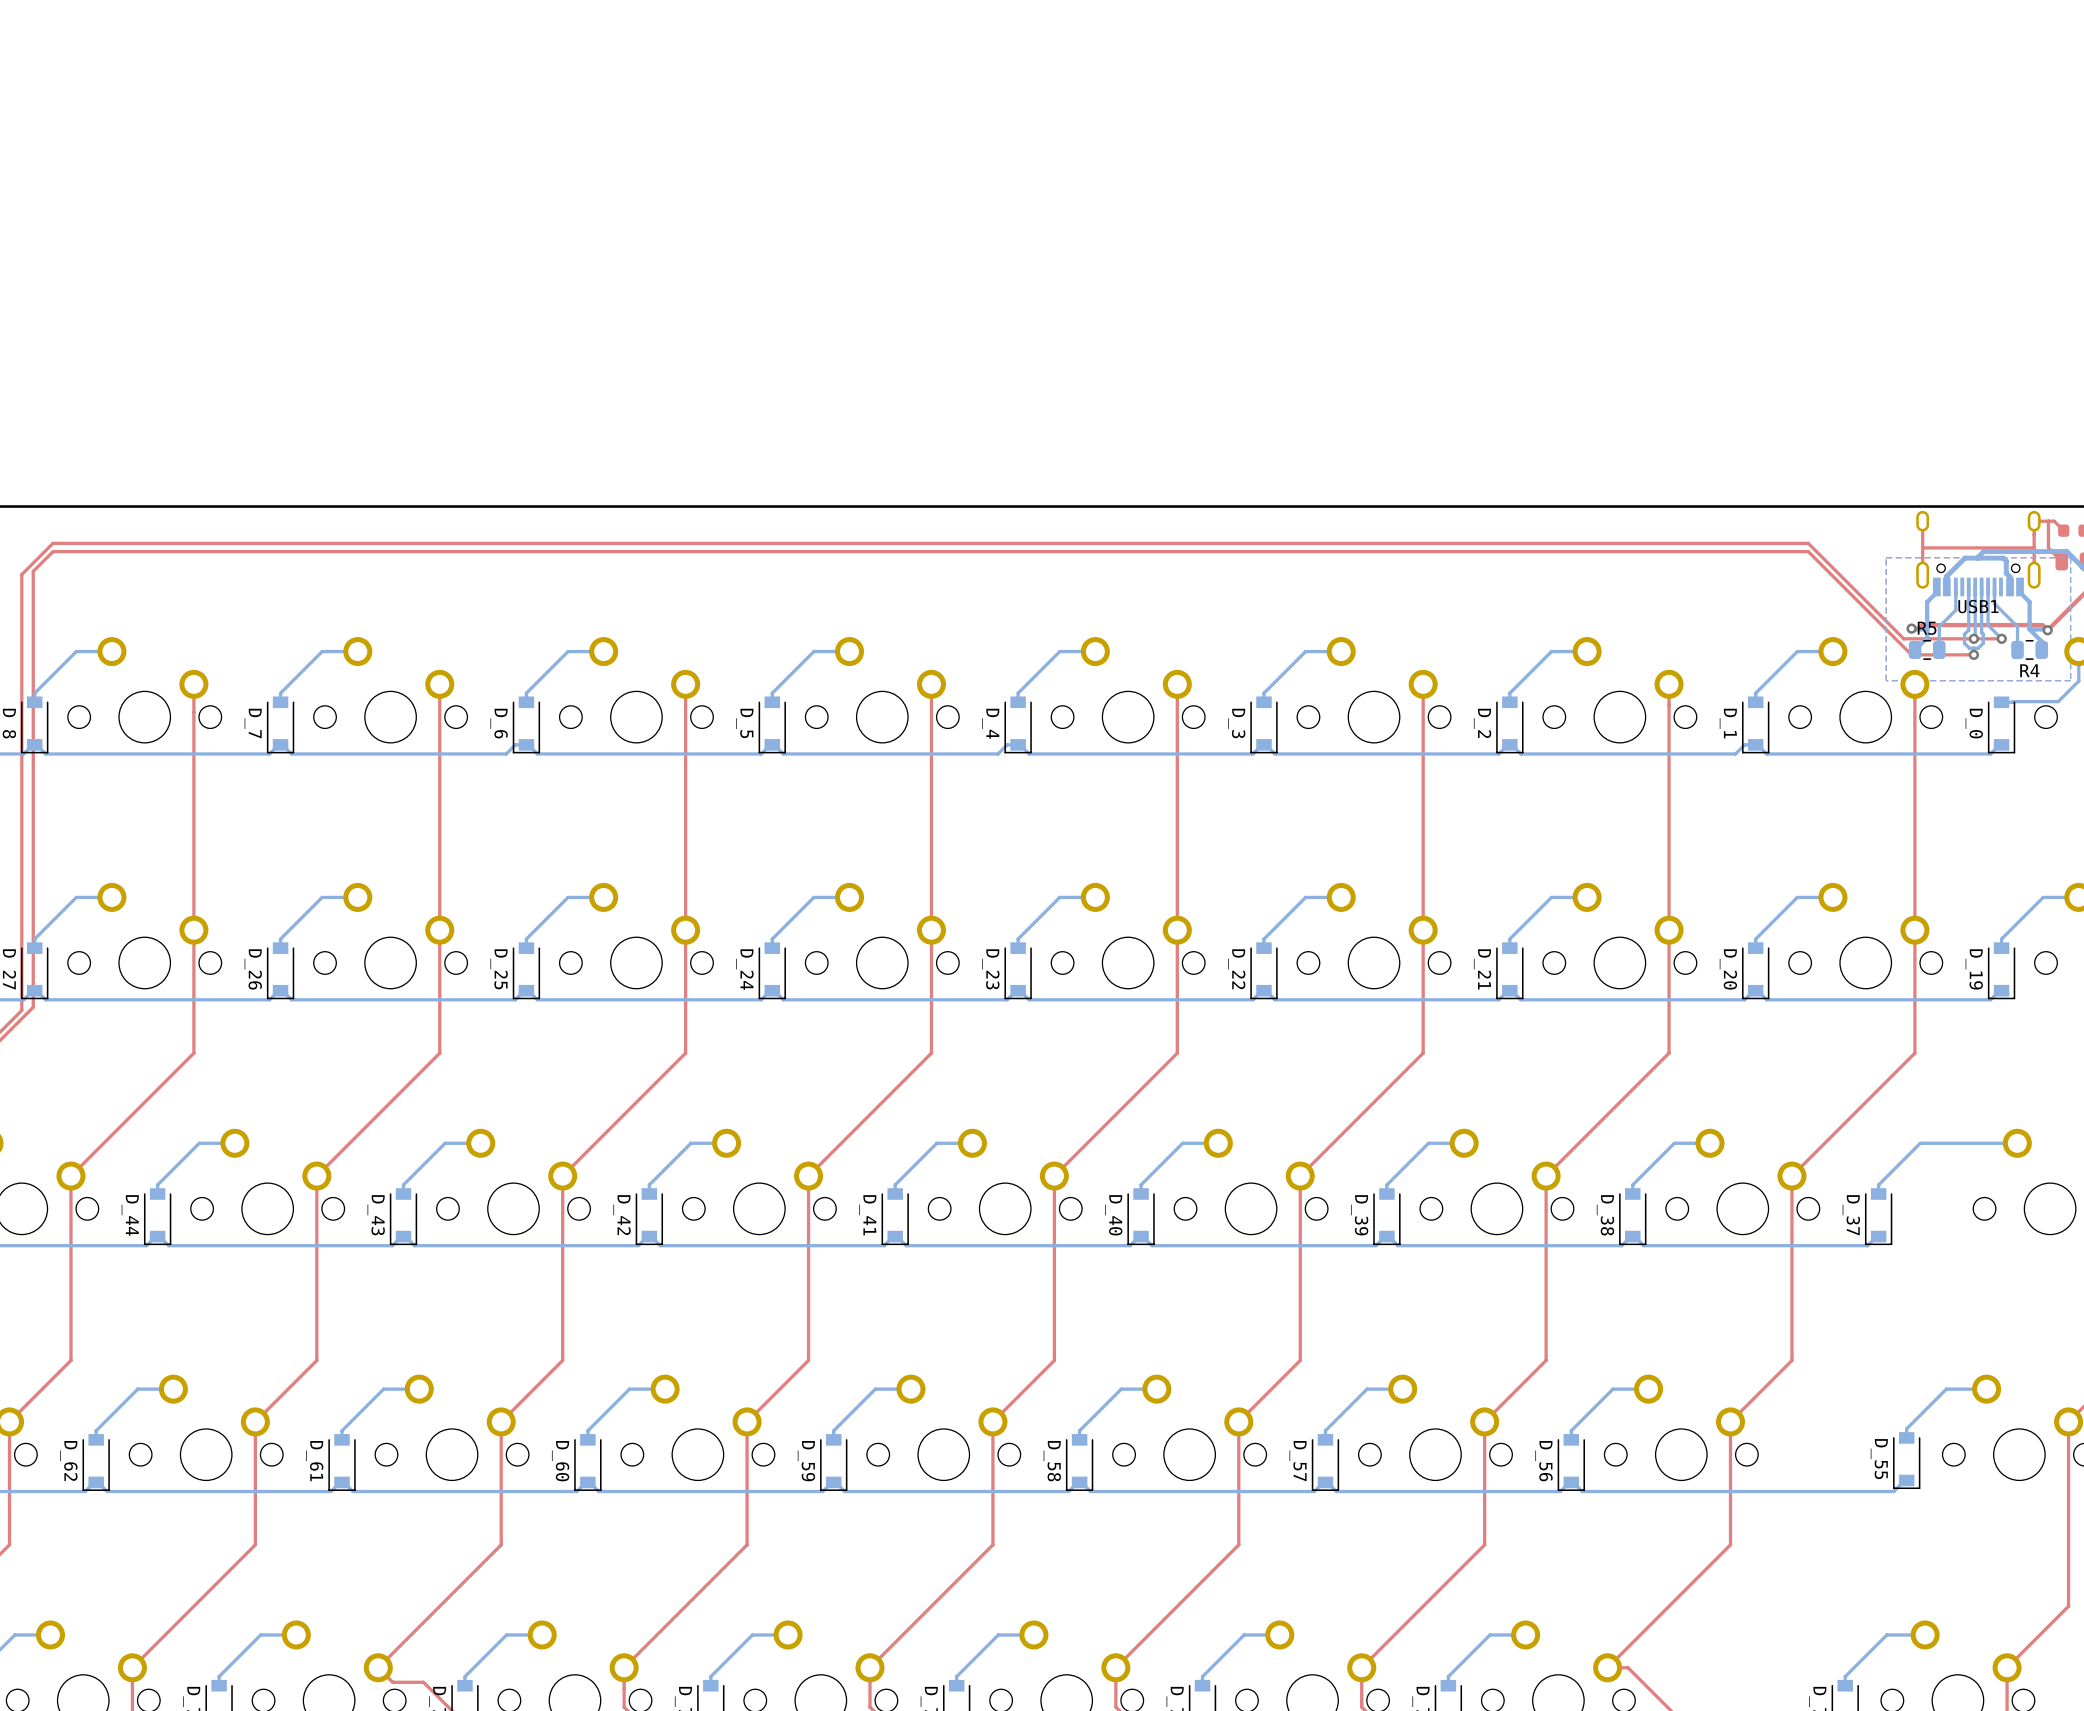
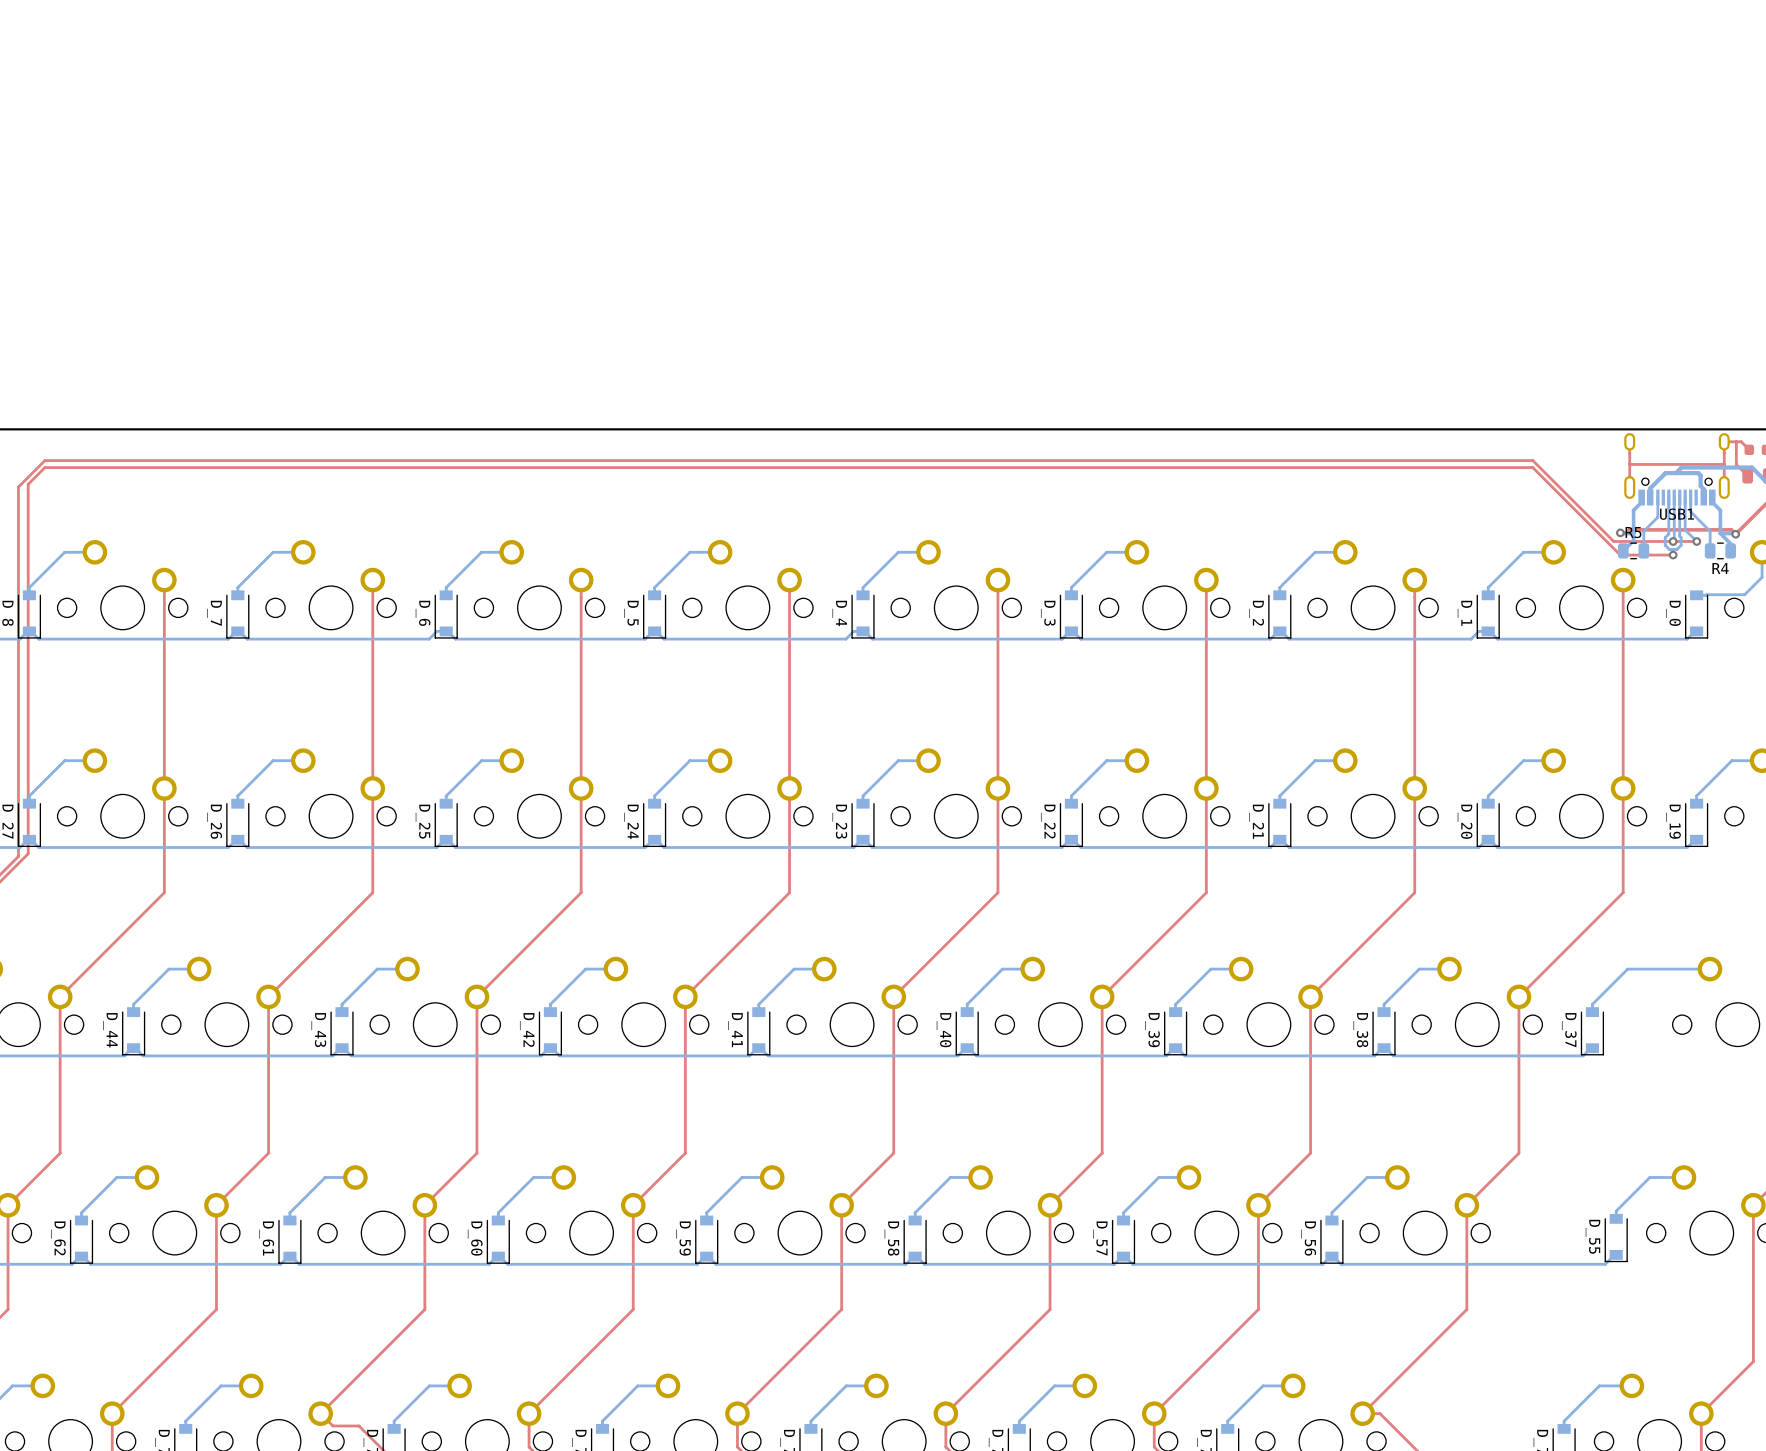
bottom zone outline: (2070, 557) (1886, 557) (1886, 680) (2070, 680) (2070, 557) -> none

